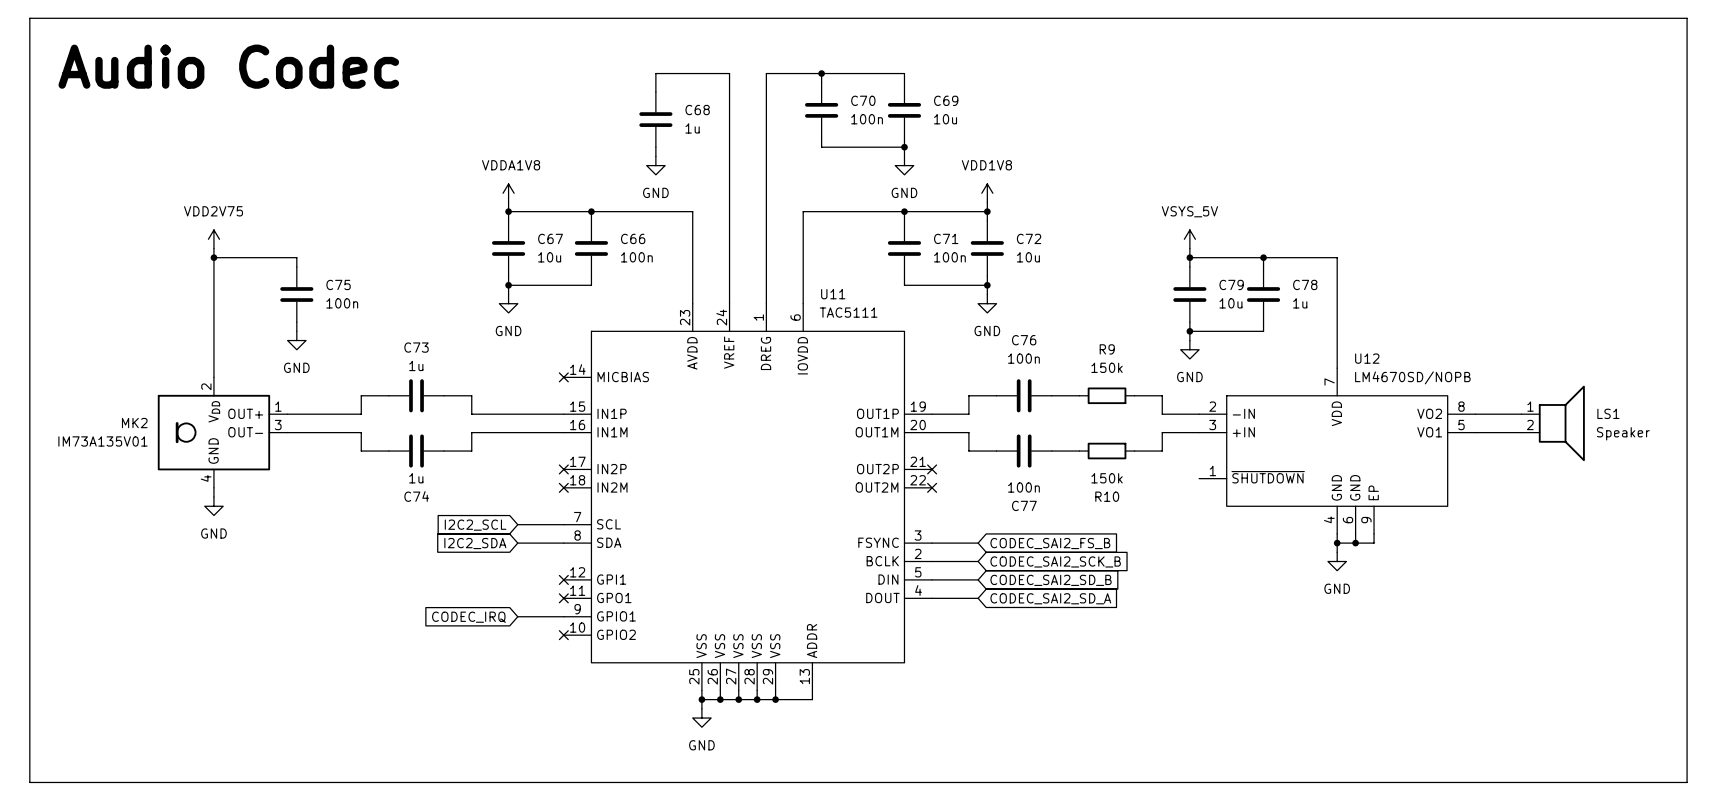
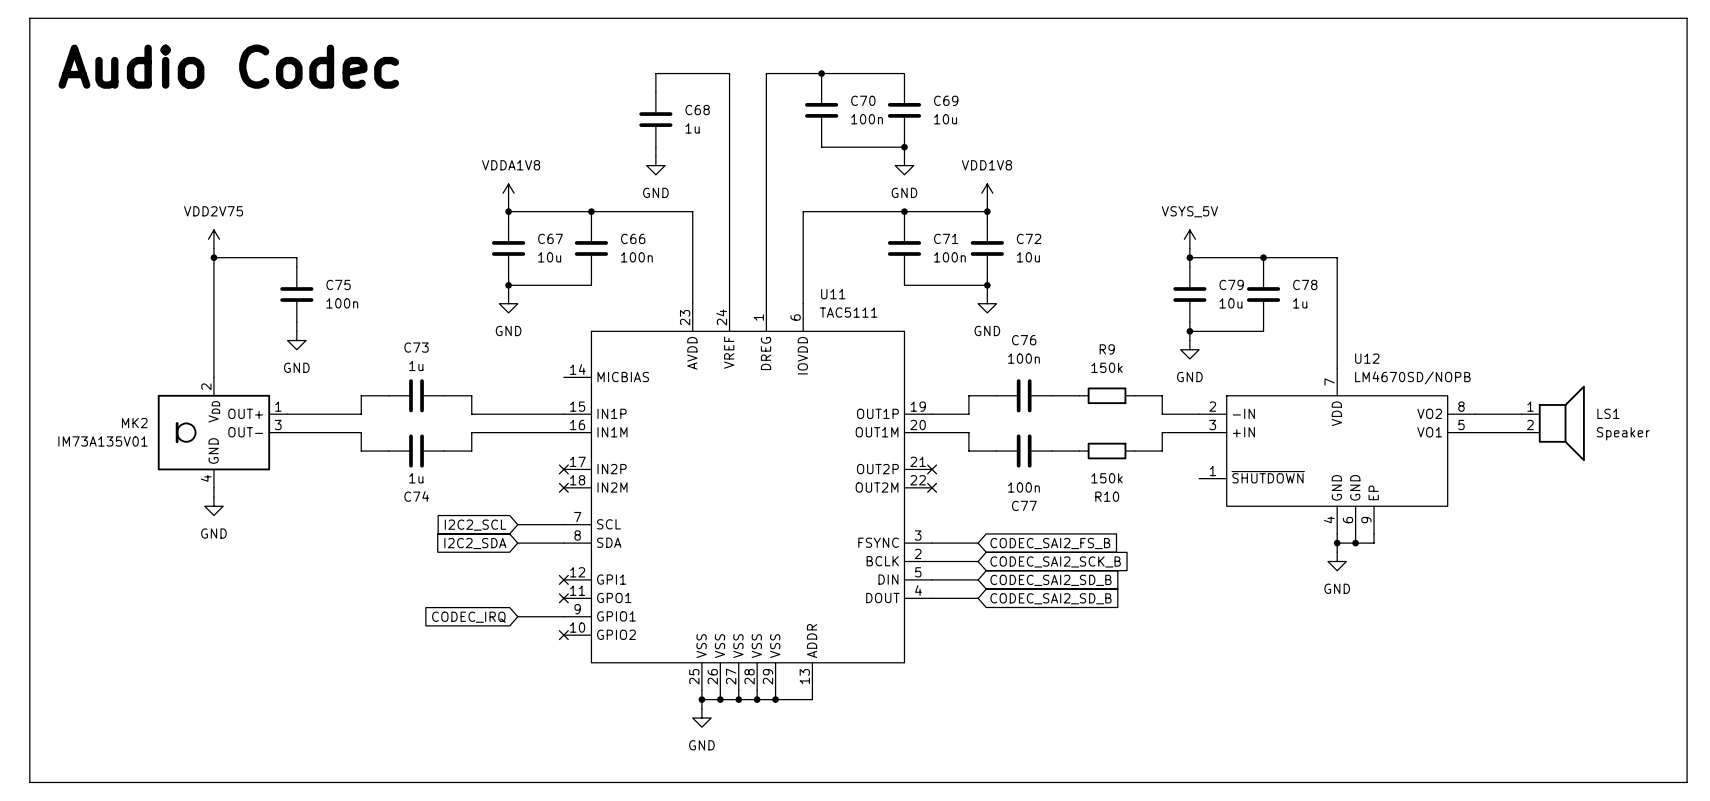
no-connect mark: (563, 377) -> none
global label: CODEC_SAI2_SD_A (1050, 598) -> CODEC_SAI2_SD_B (1051, 598)

